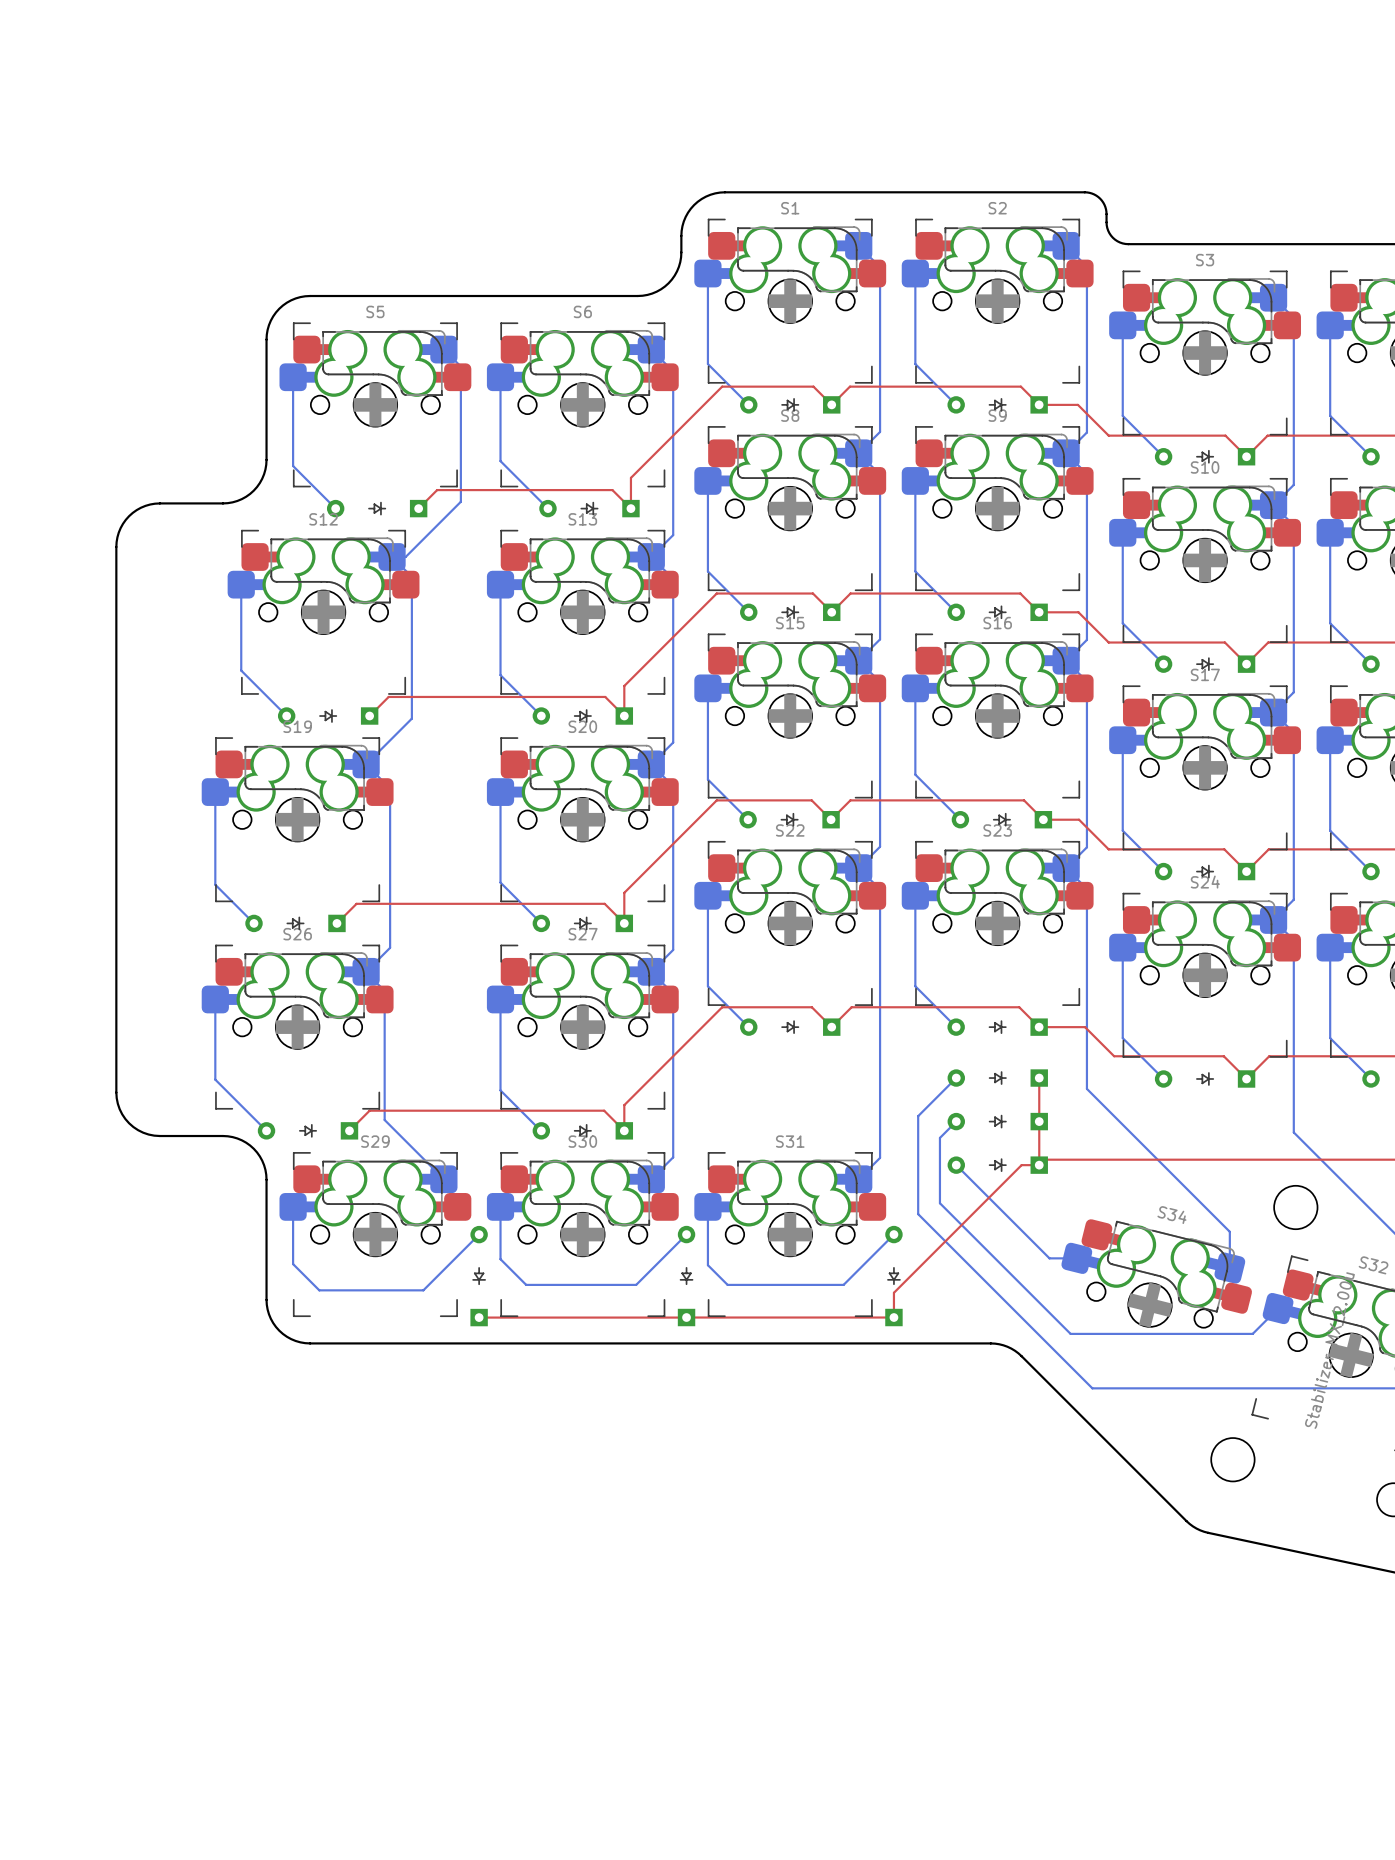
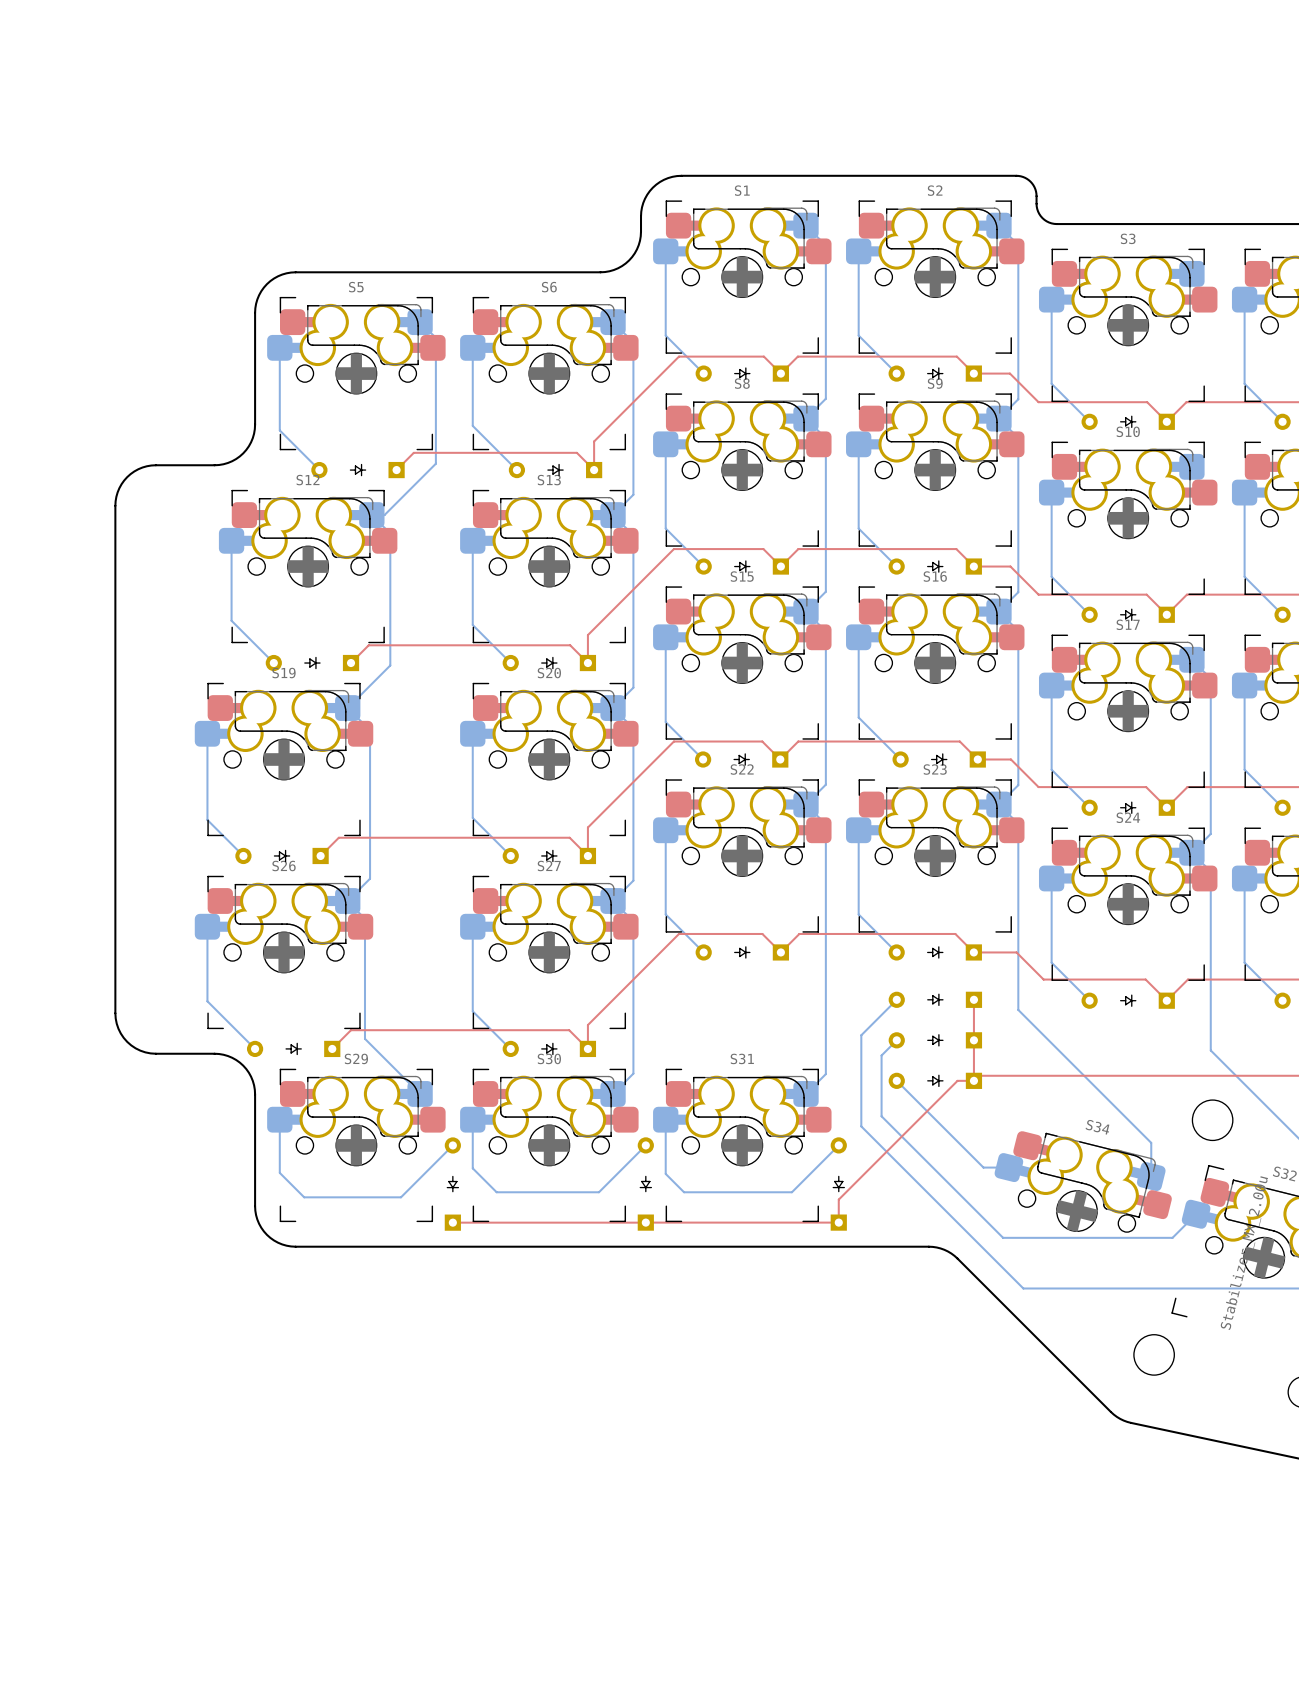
bottom track: (1273, 297) (1293, 317) (1293, 484) (1273, 505) (1293, 525) (1293, 692) (1273, 712) -> none

